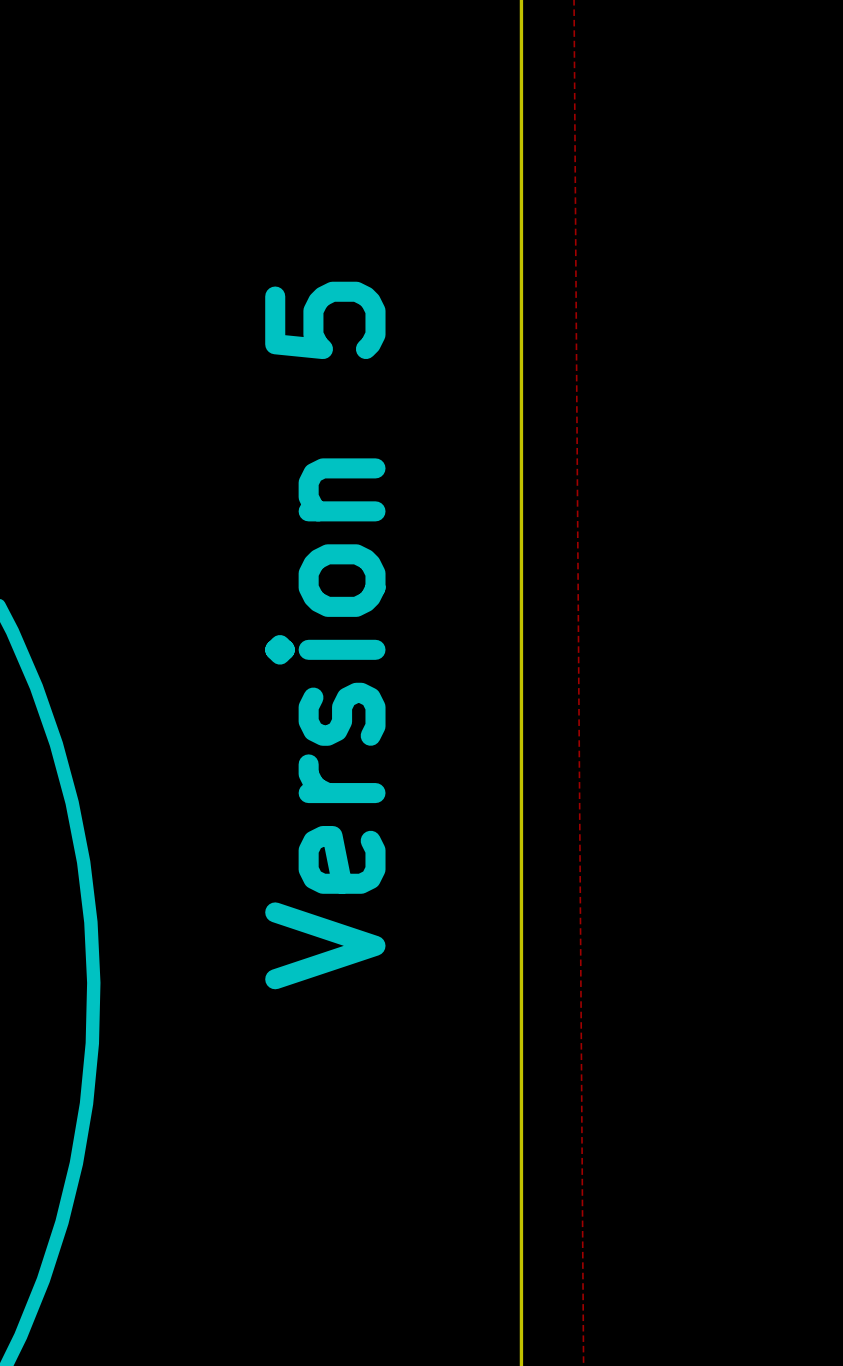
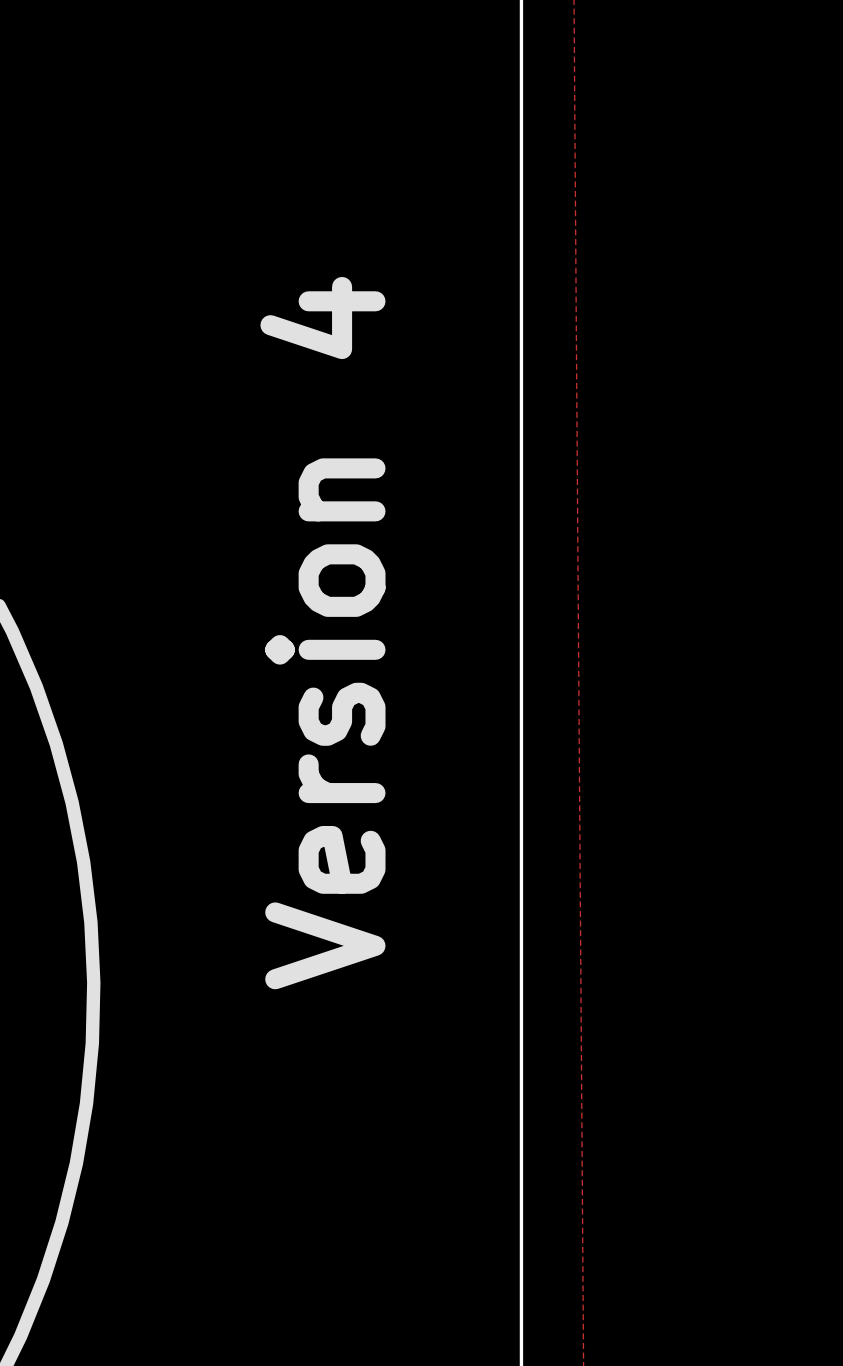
text: Version 5 (325, 635) -> Version 4 (322, 633)

